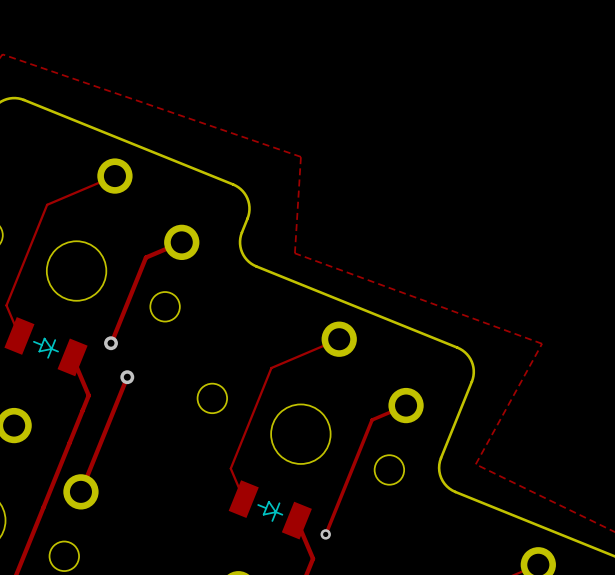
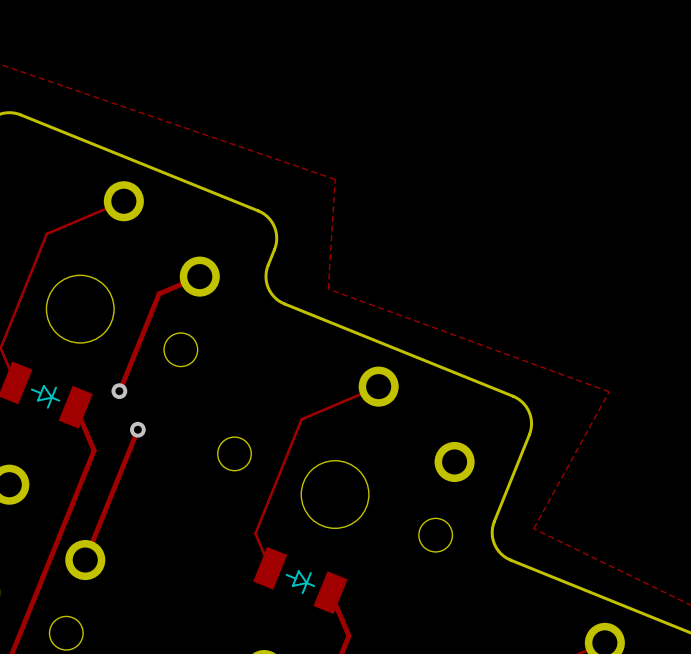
track: (406, 405) (372, 419) (326, 533) -> none
via: (325, 534) -> none

